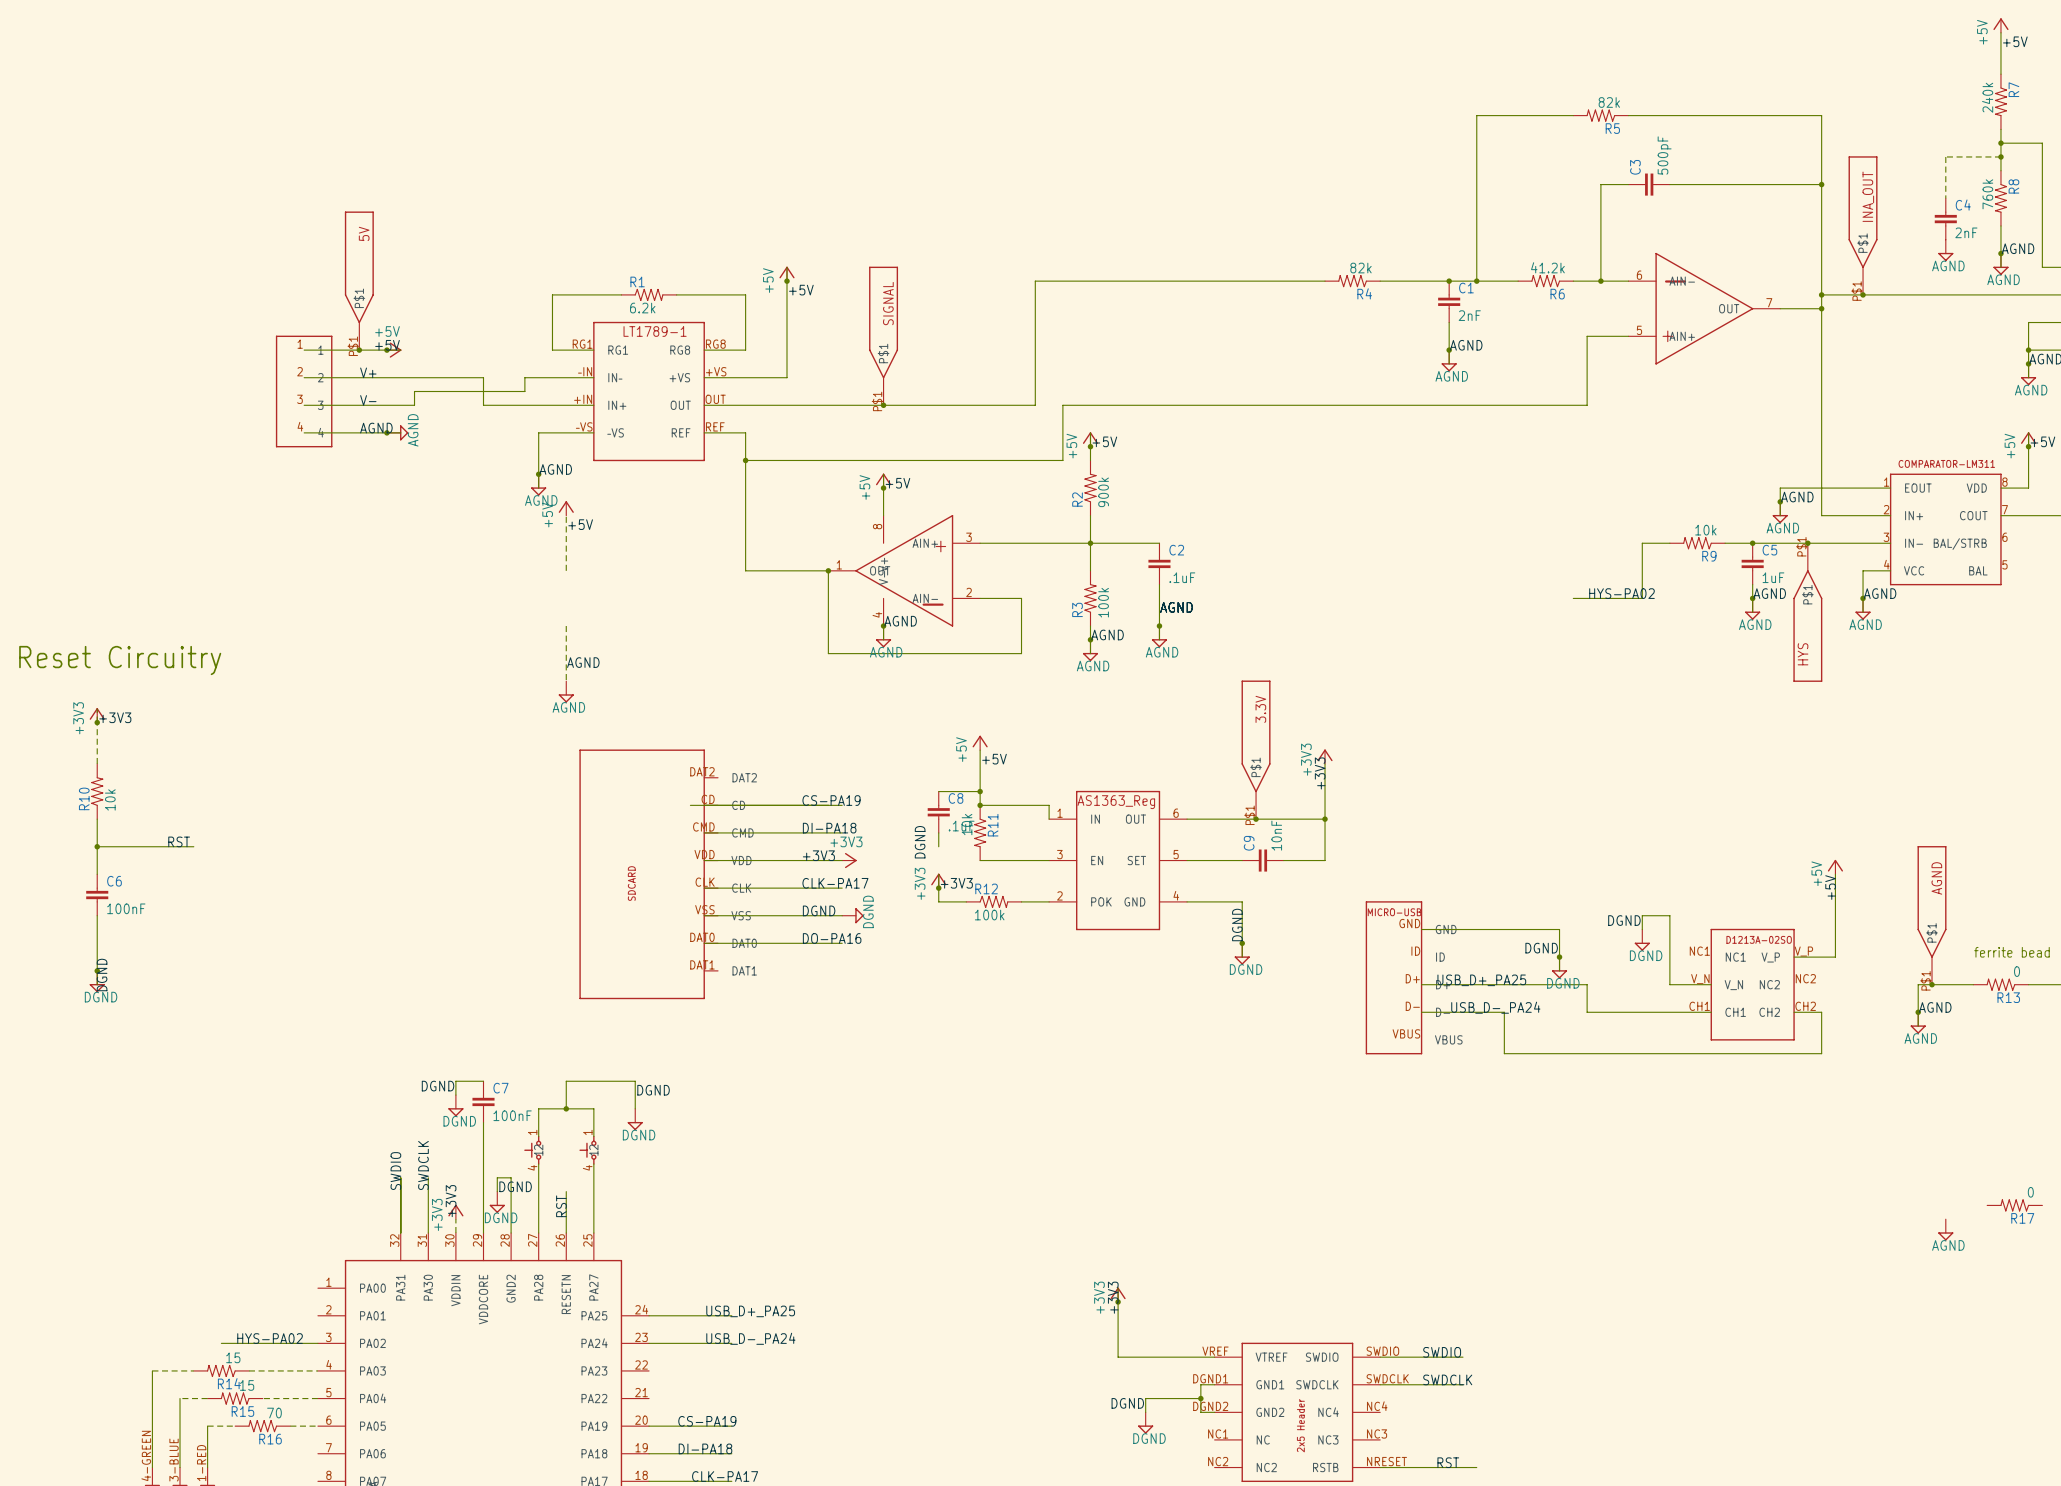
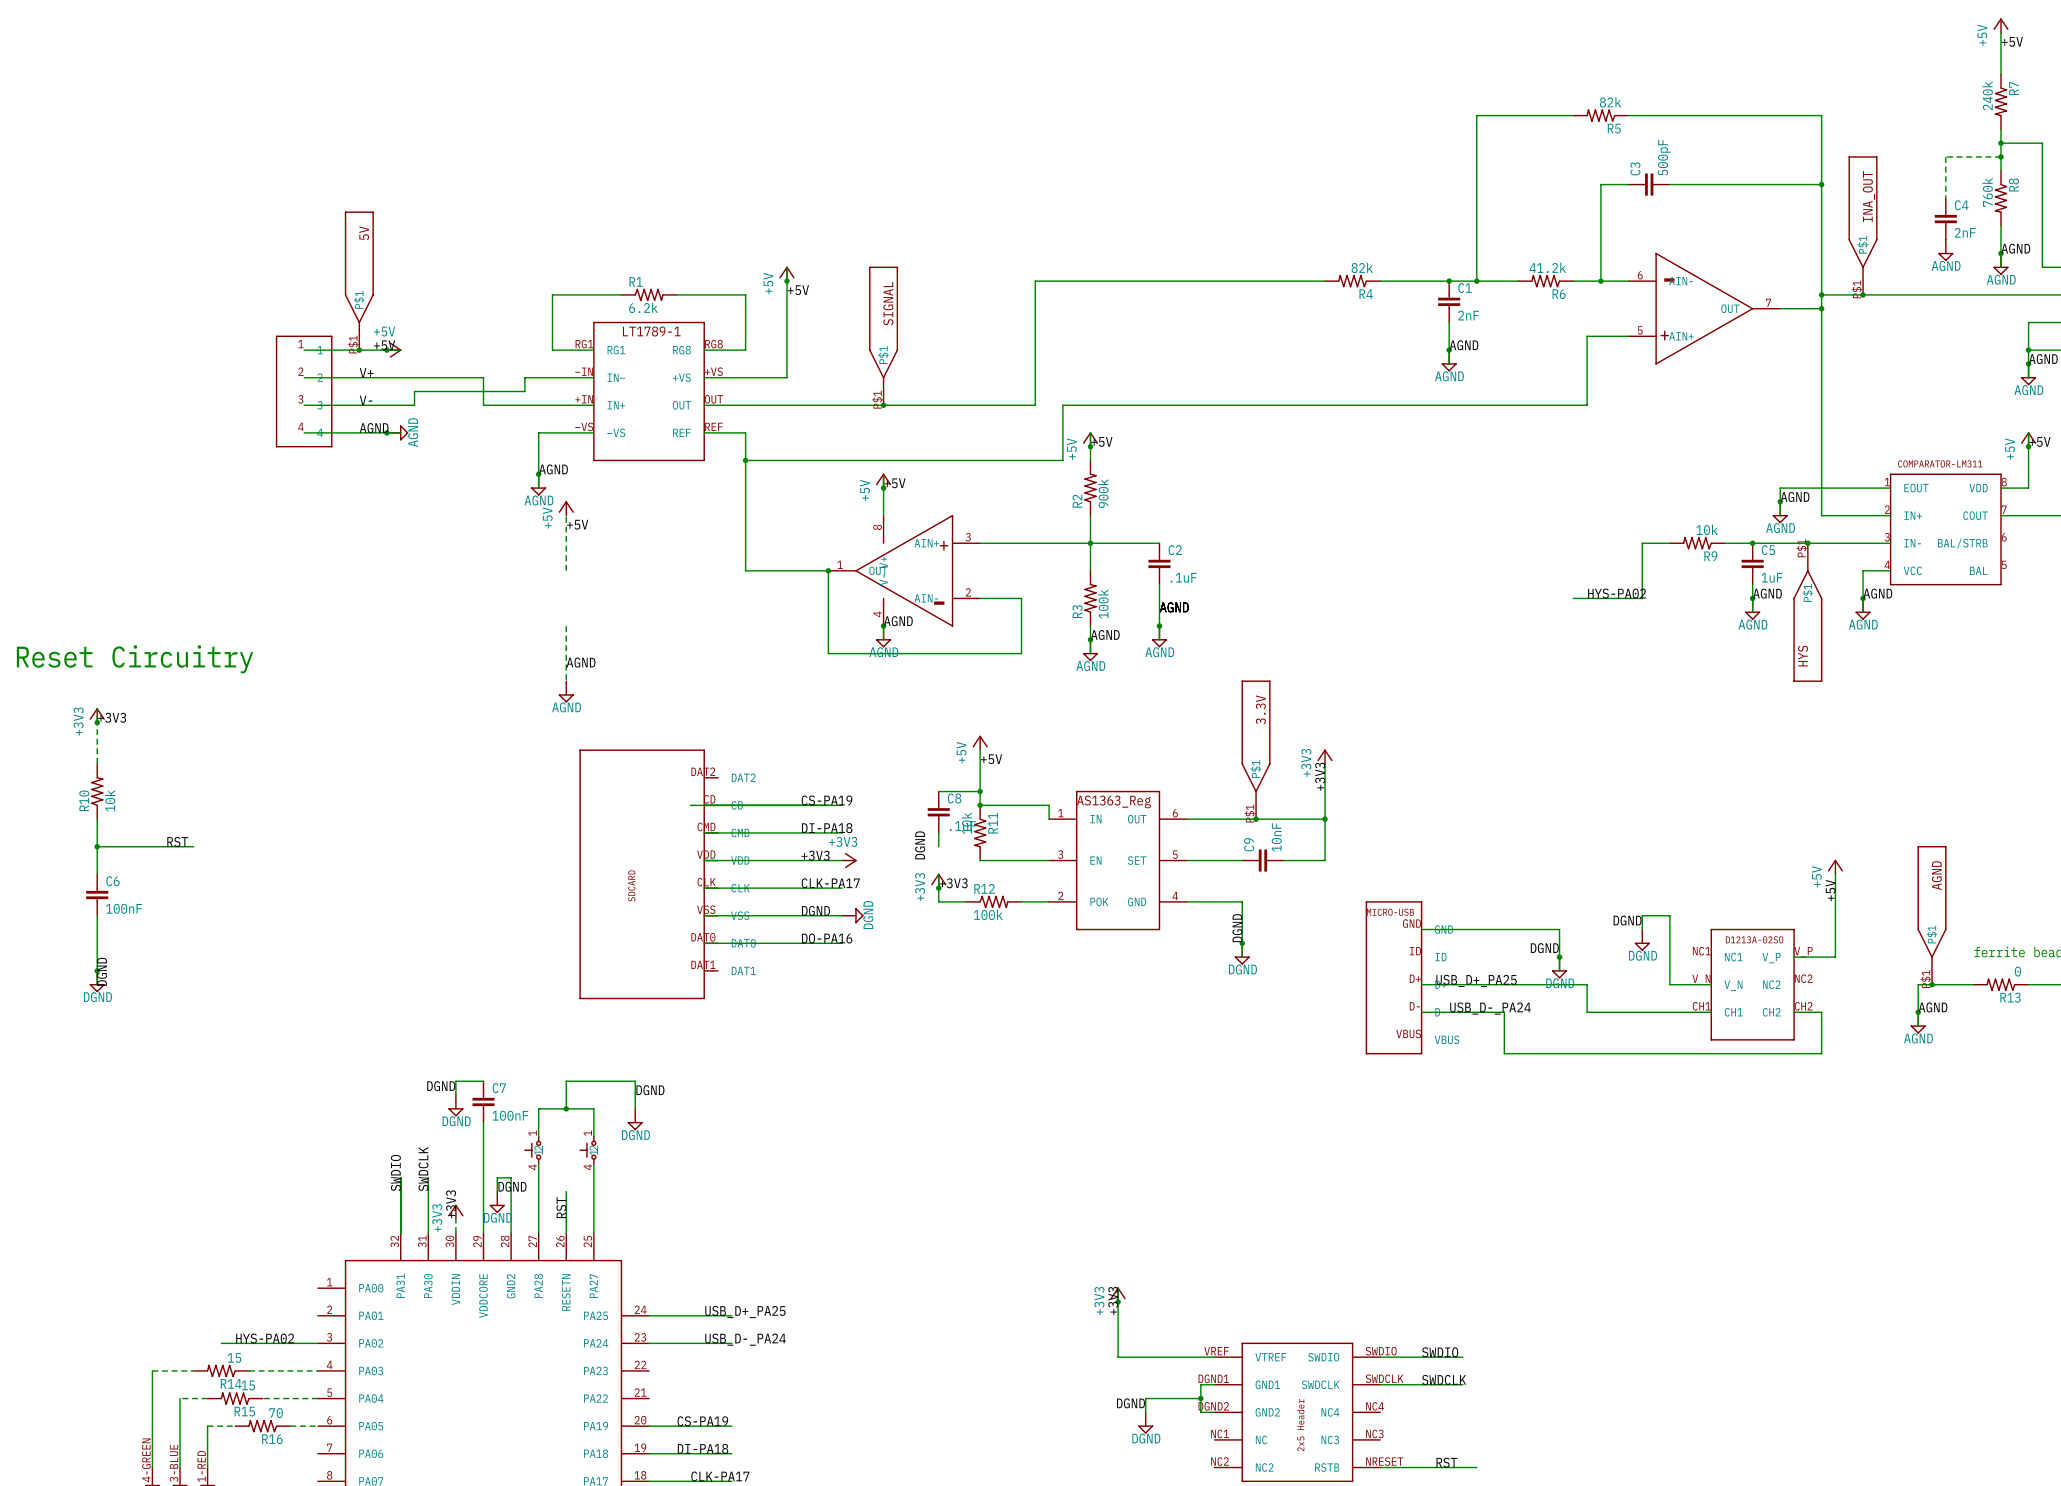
R17: 0 (2014, 1205) -> none
power symbol: AGND (1945, 1229) -> none

